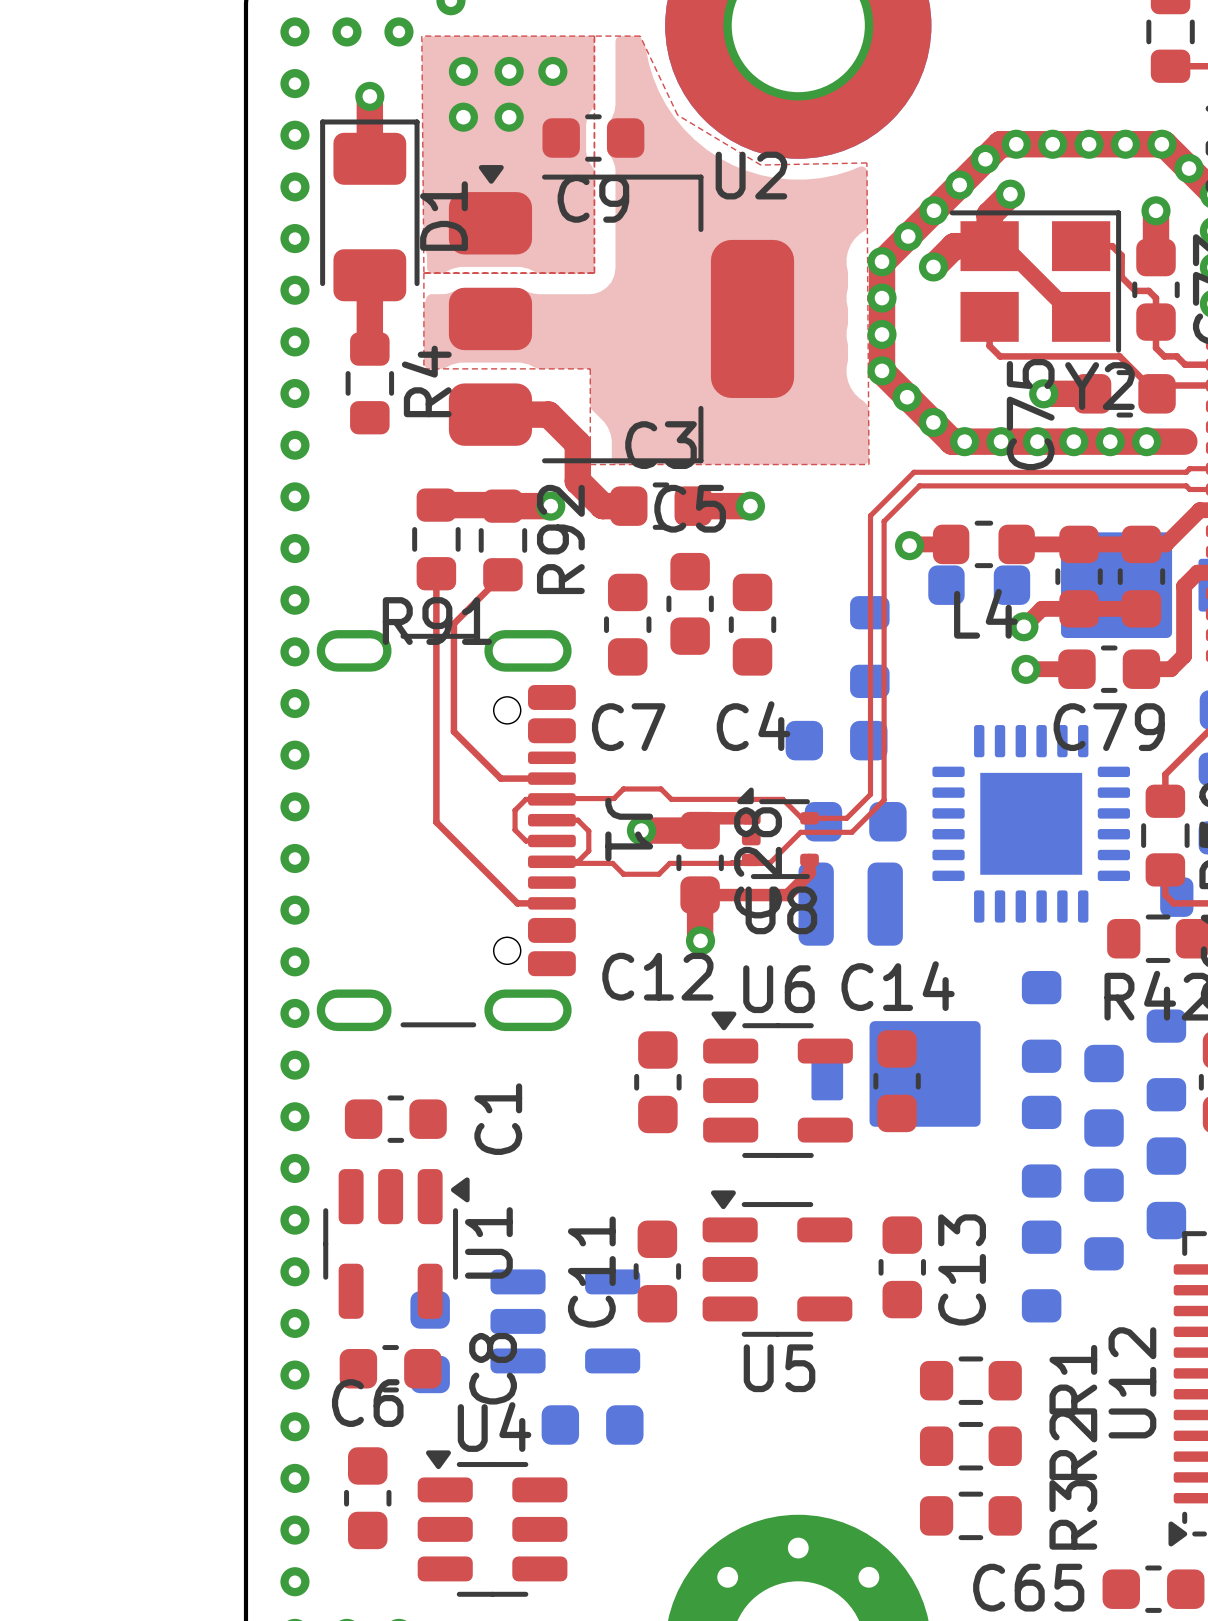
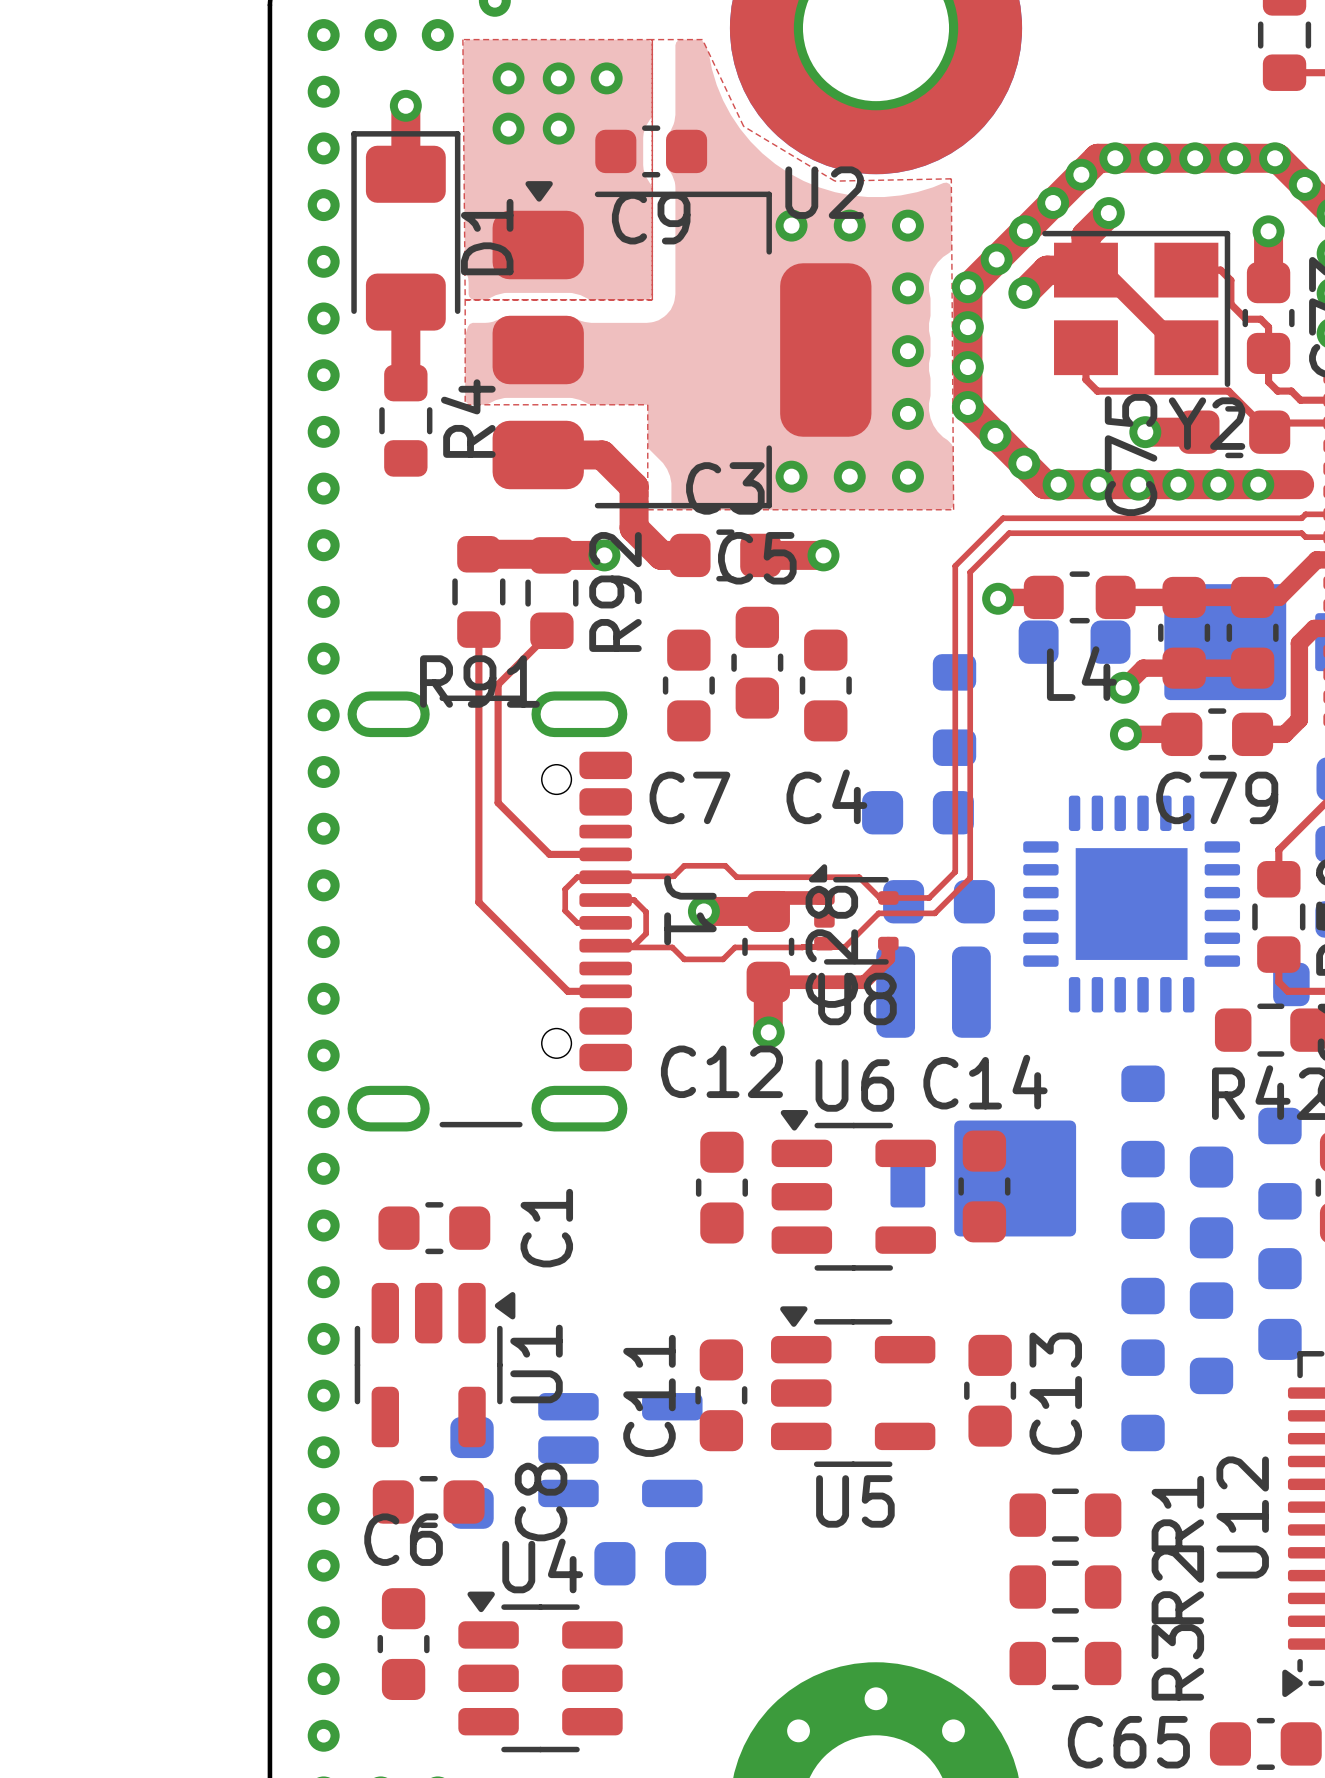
via: none -> (791, 225)
via: none -> (849, 225)
via: none -> (907, 225)
via: none -> (907, 288)
via: none -> (907, 351)
via: none -> (907, 413)
via: none -> (791, 476)
via: none -> (849, 476)
via: none -> (907, 476)

